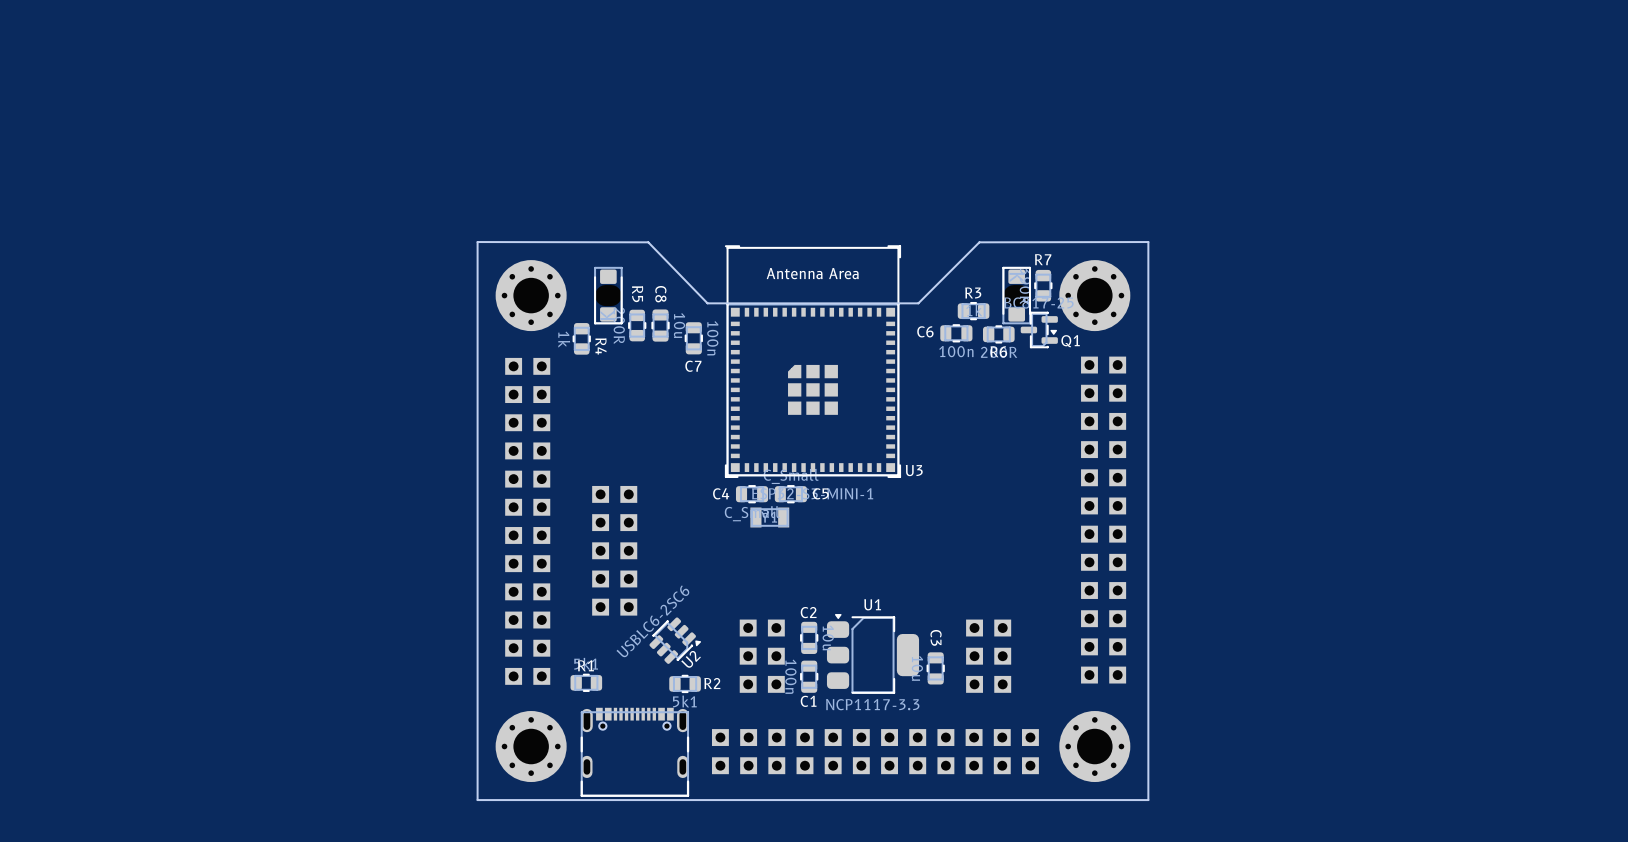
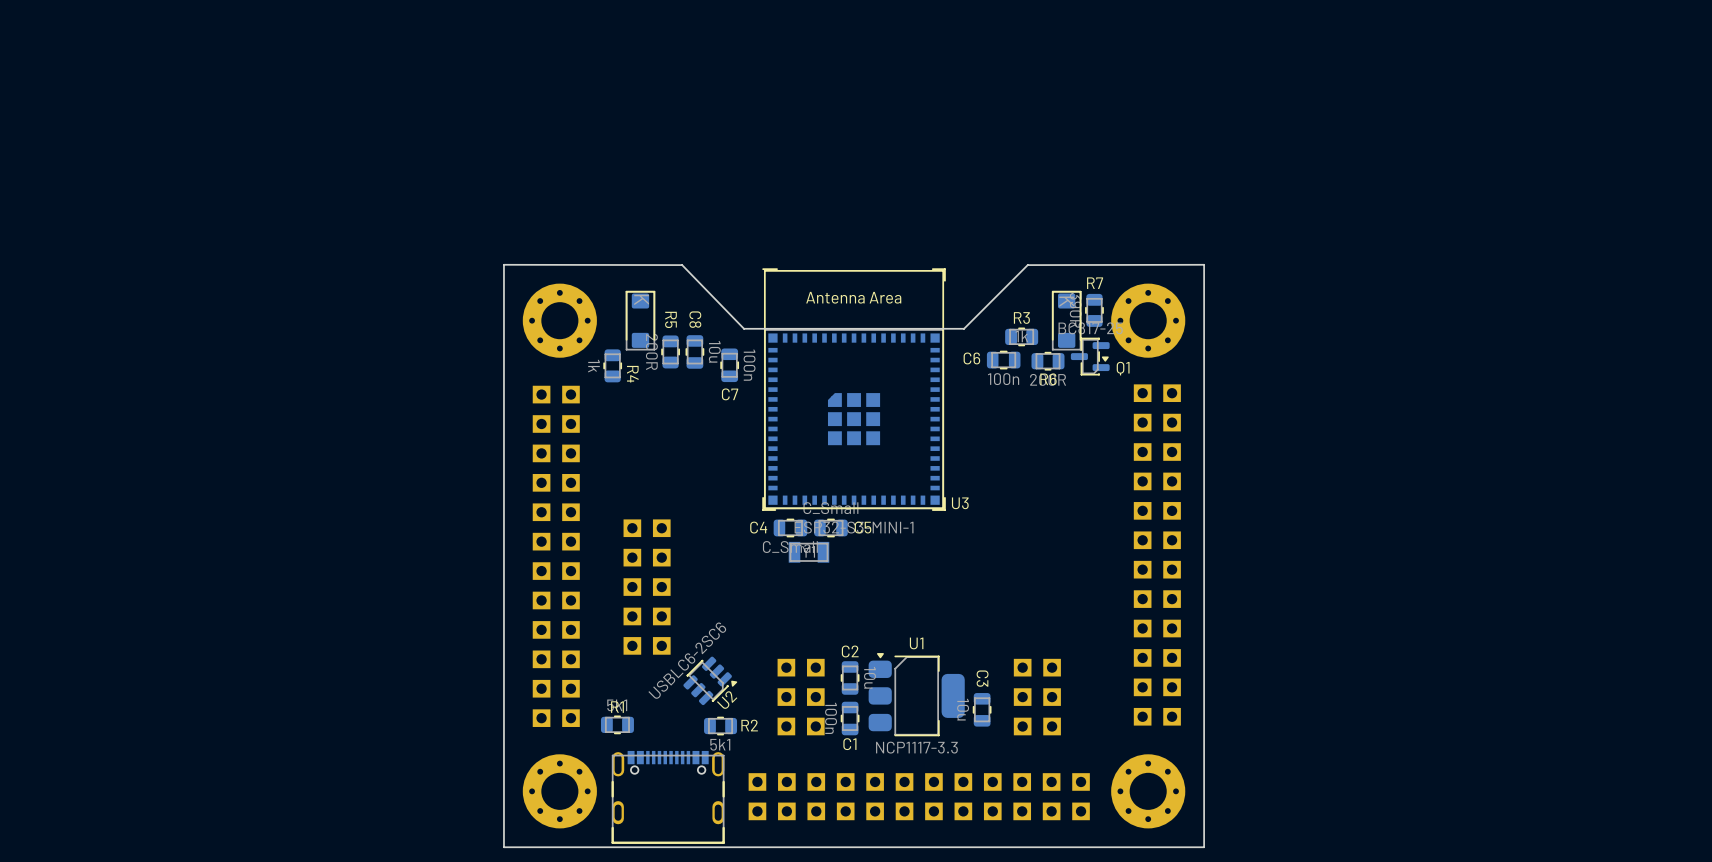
part rotation: 0° (608, 295) -> 180° (640, 320)

